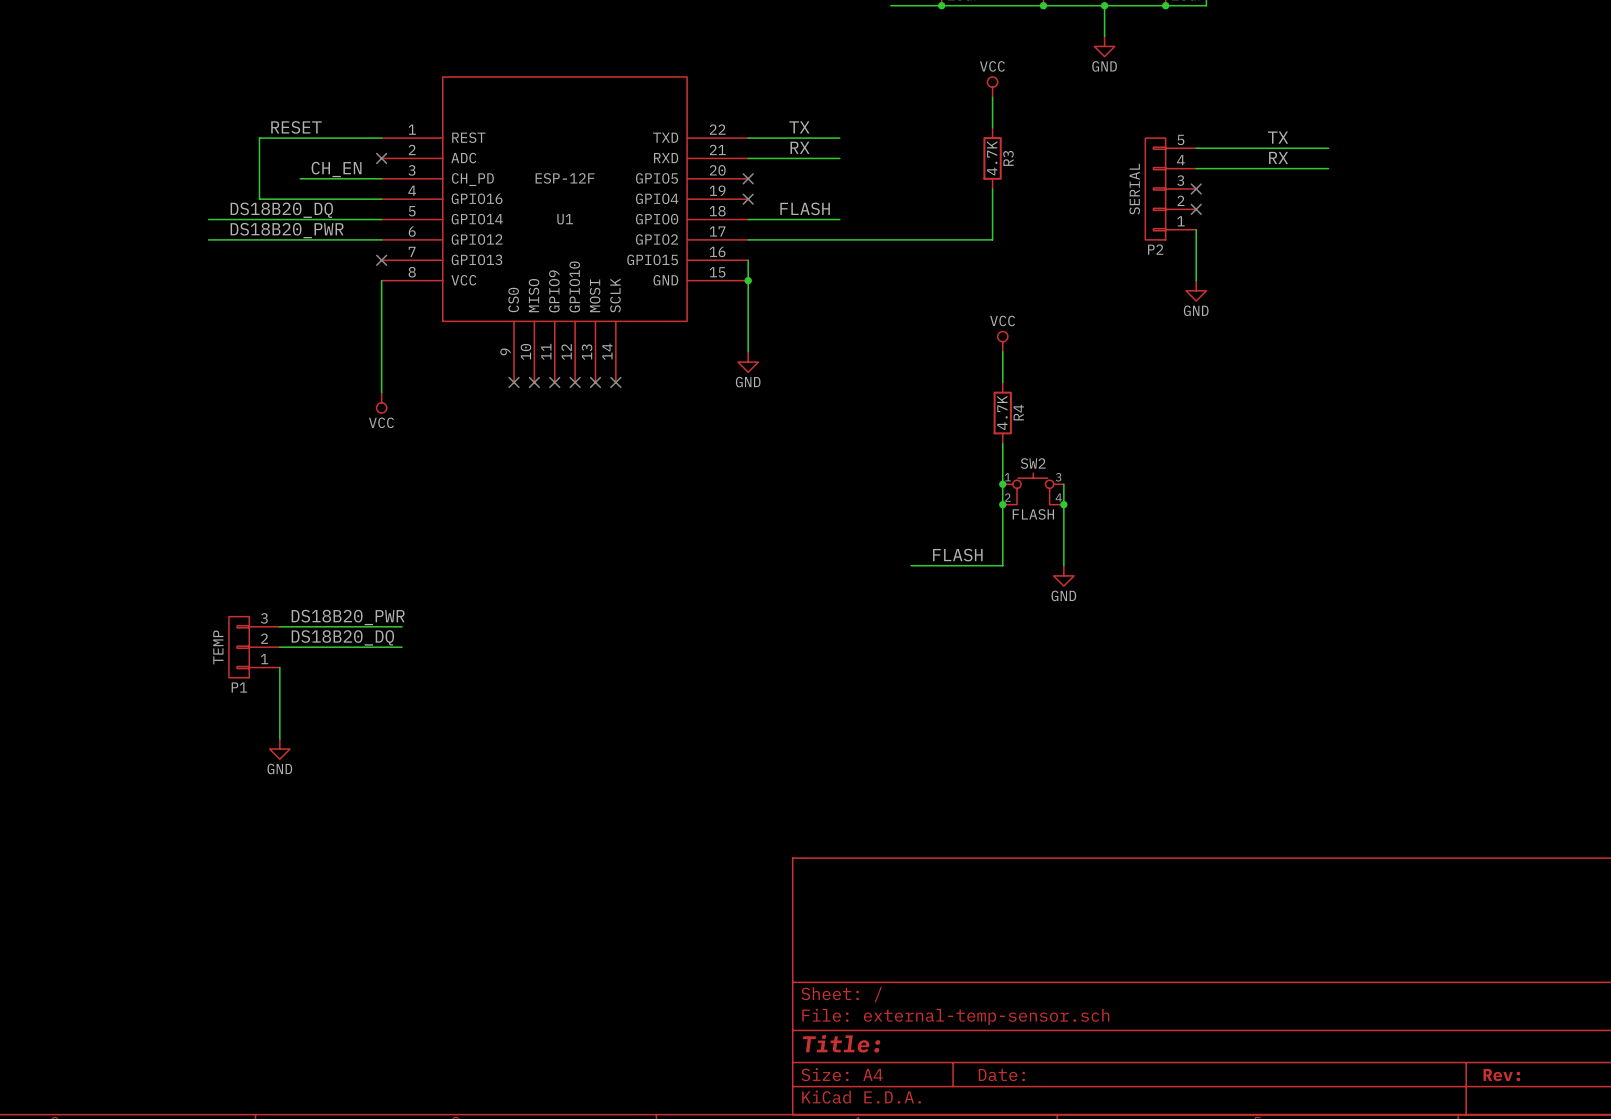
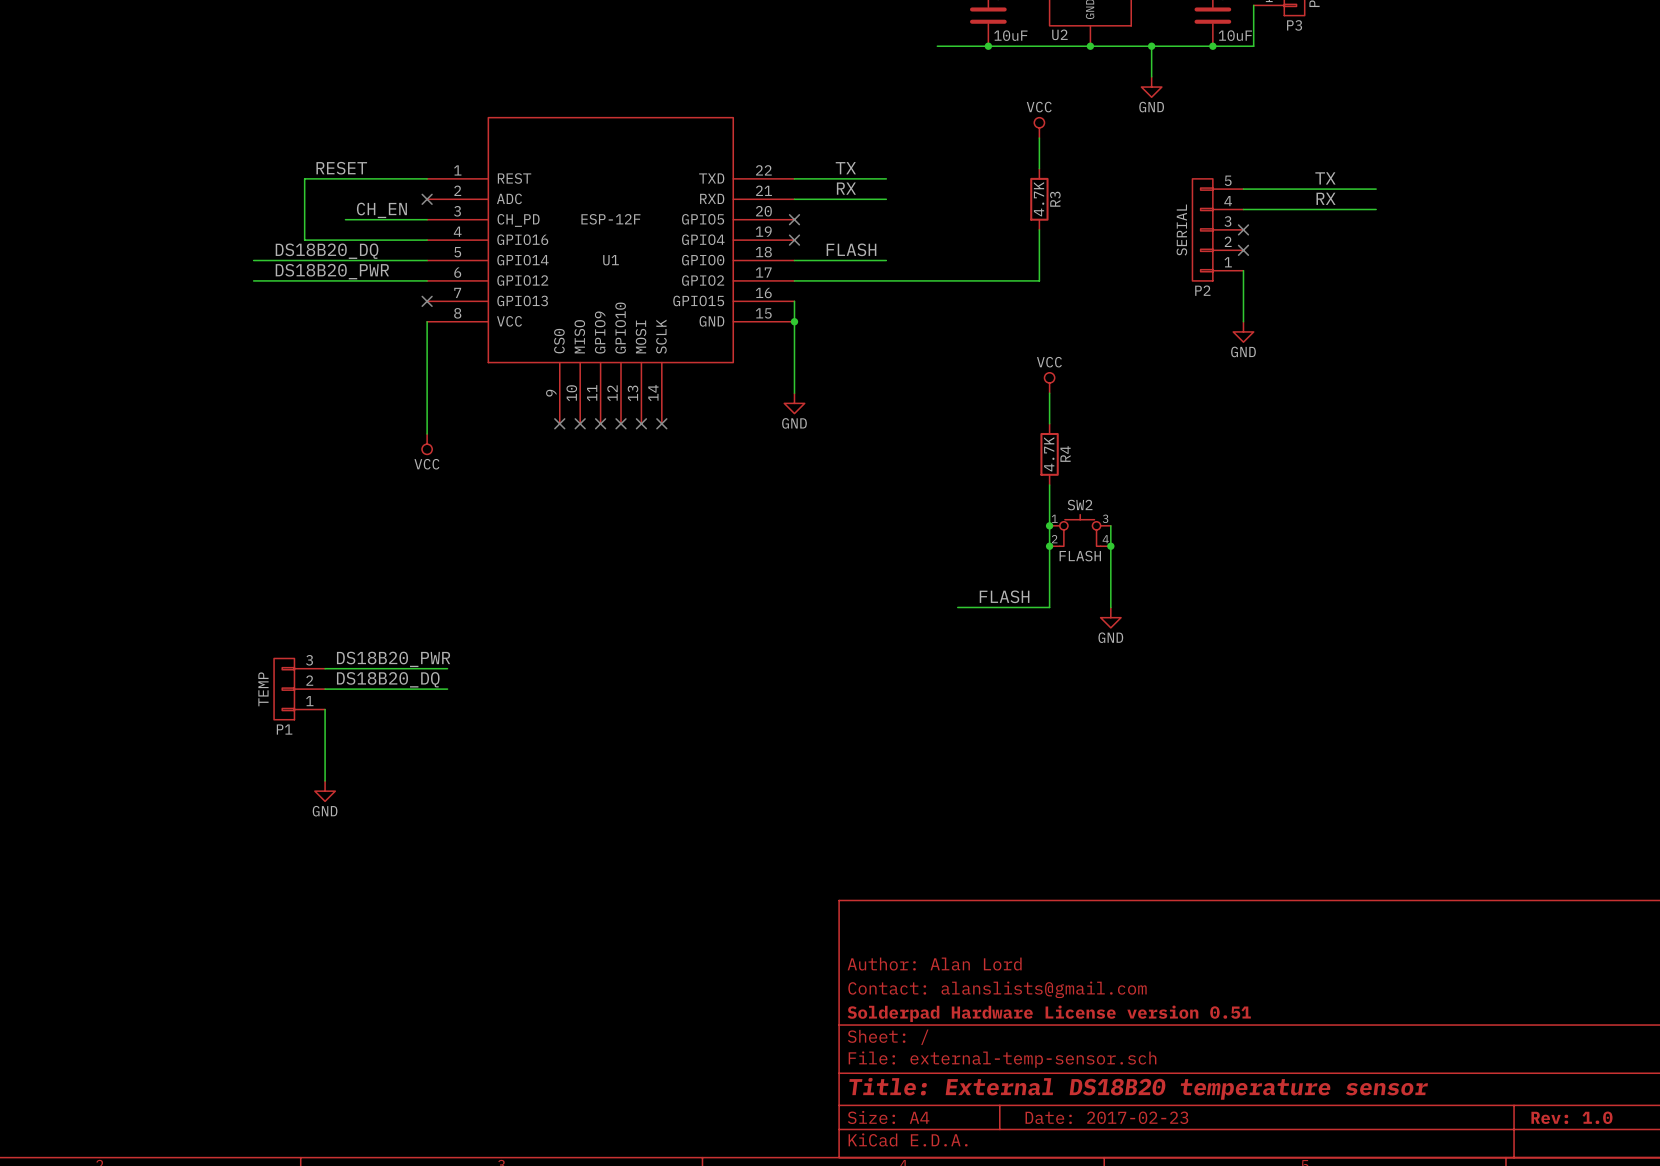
title block: none -> Author: Alan Lord (934, 964)
title block: none -> Contact: alanslists@gmail.com (997, 989)
title block: none -> Solderpad Hardware License version 0.51 (1049, 1013)
title block: Title: (841, 1043) -> Title: External DS18B20 temperature sensor (1138, 1088)
title block: Date: (1001, 1075) -> Date: 2017-02-23 (1106, 1117)
title block: Rev: (1501, 1075) -> Rev: 1.0 (1571, 1117)

